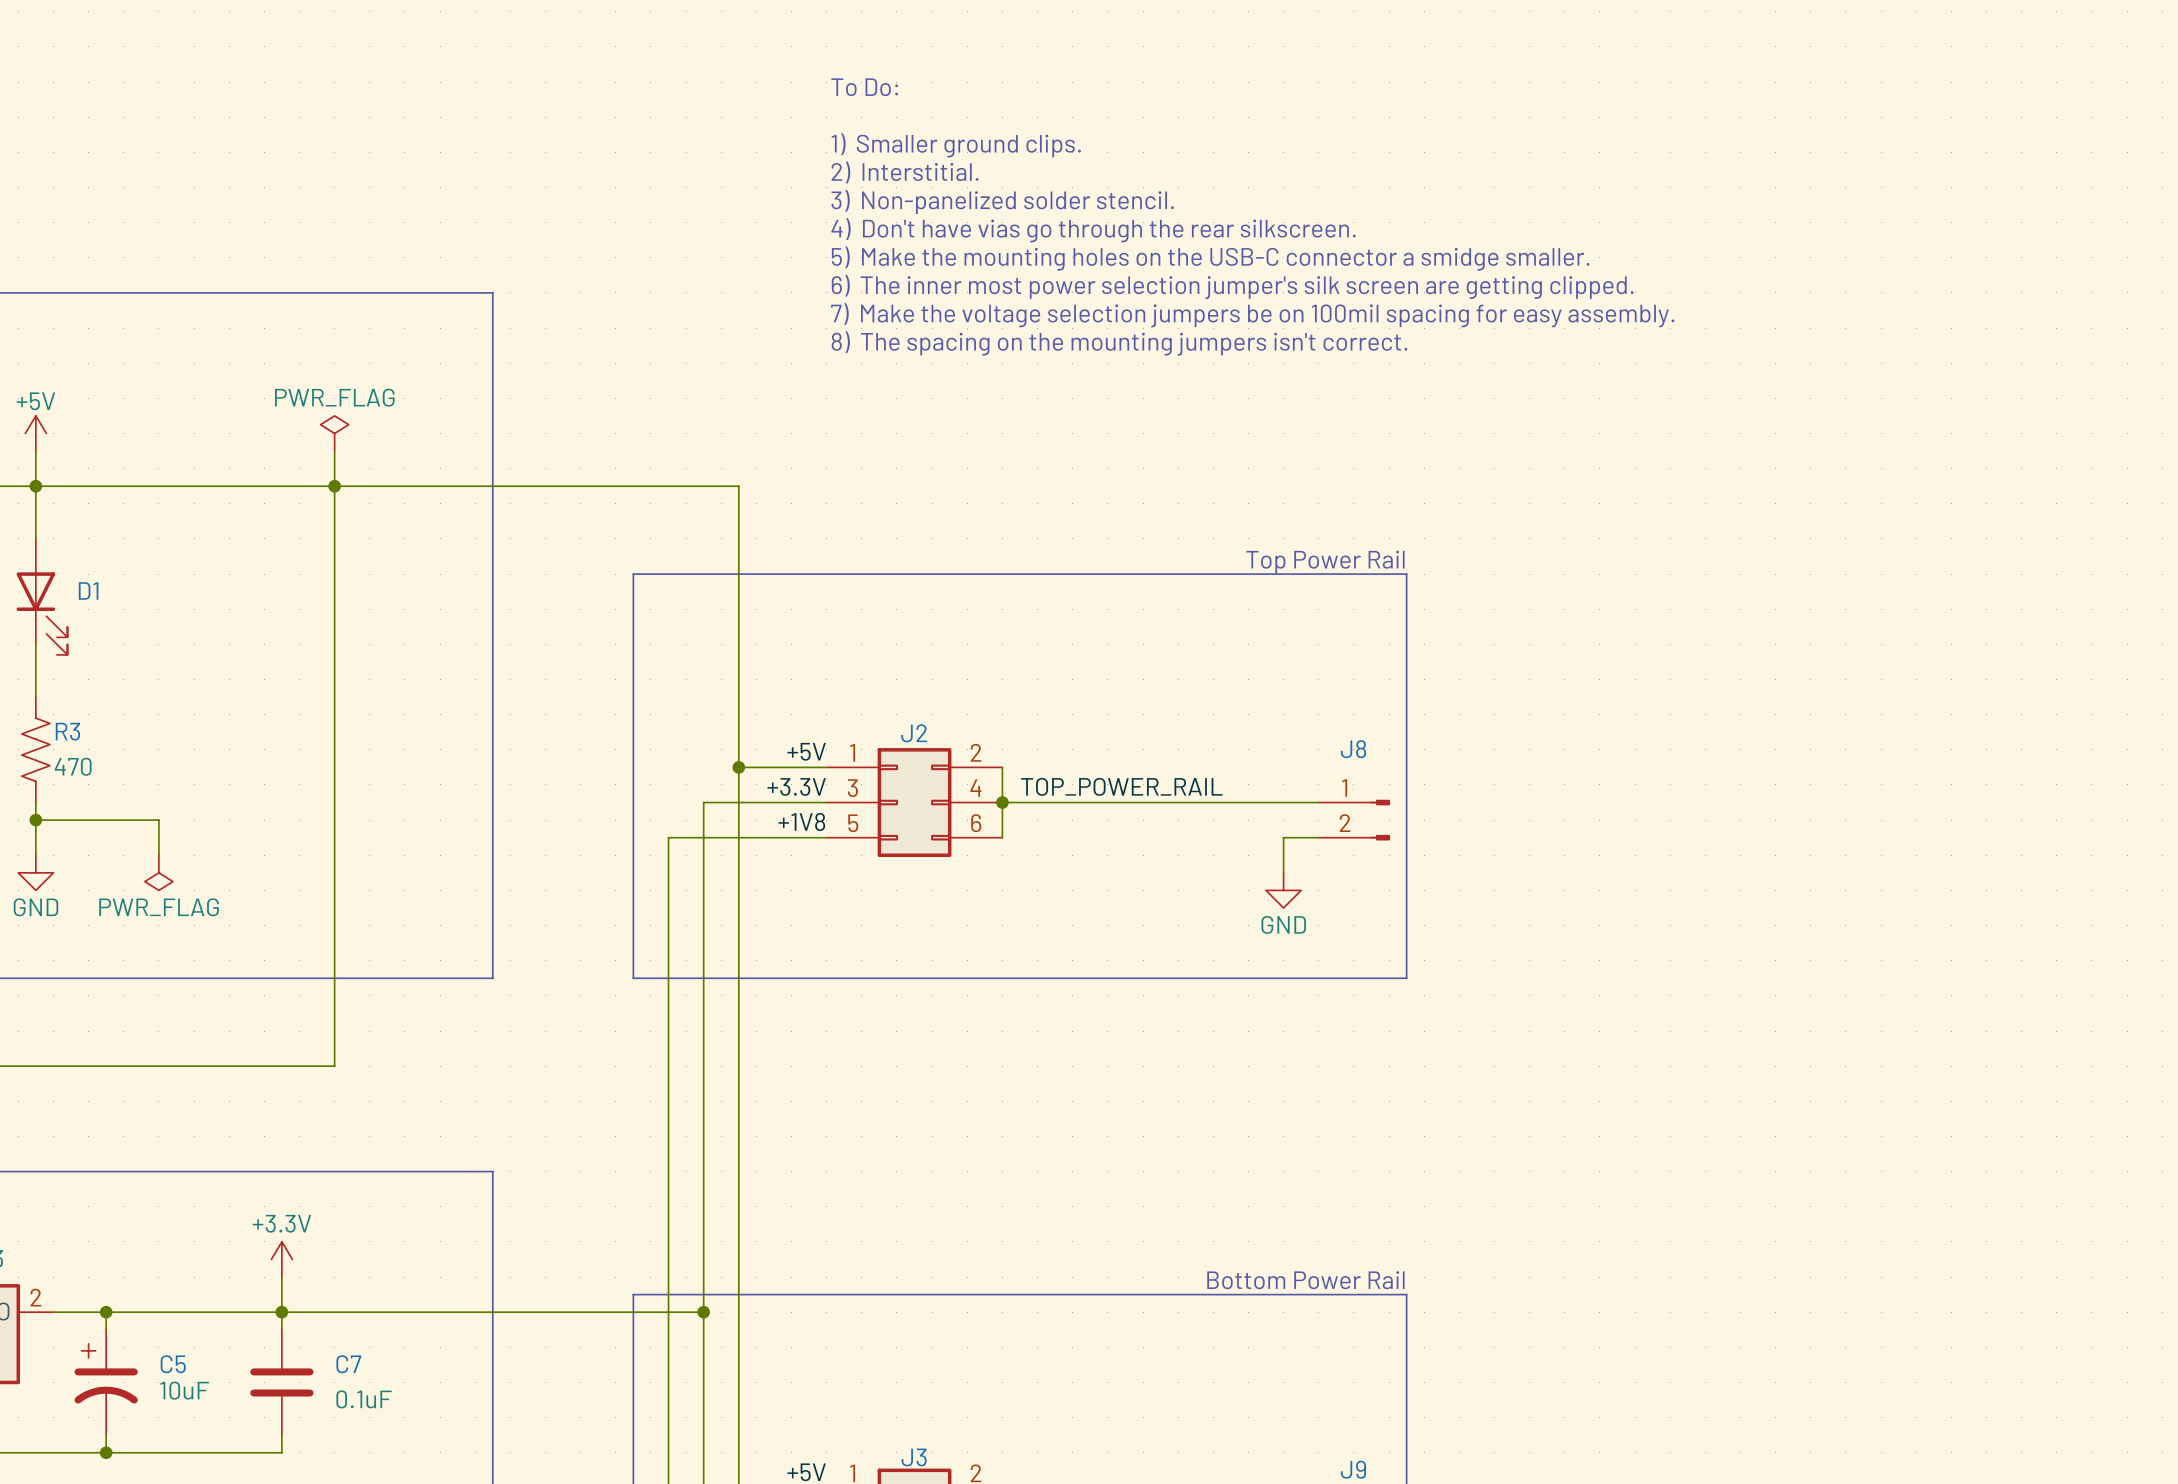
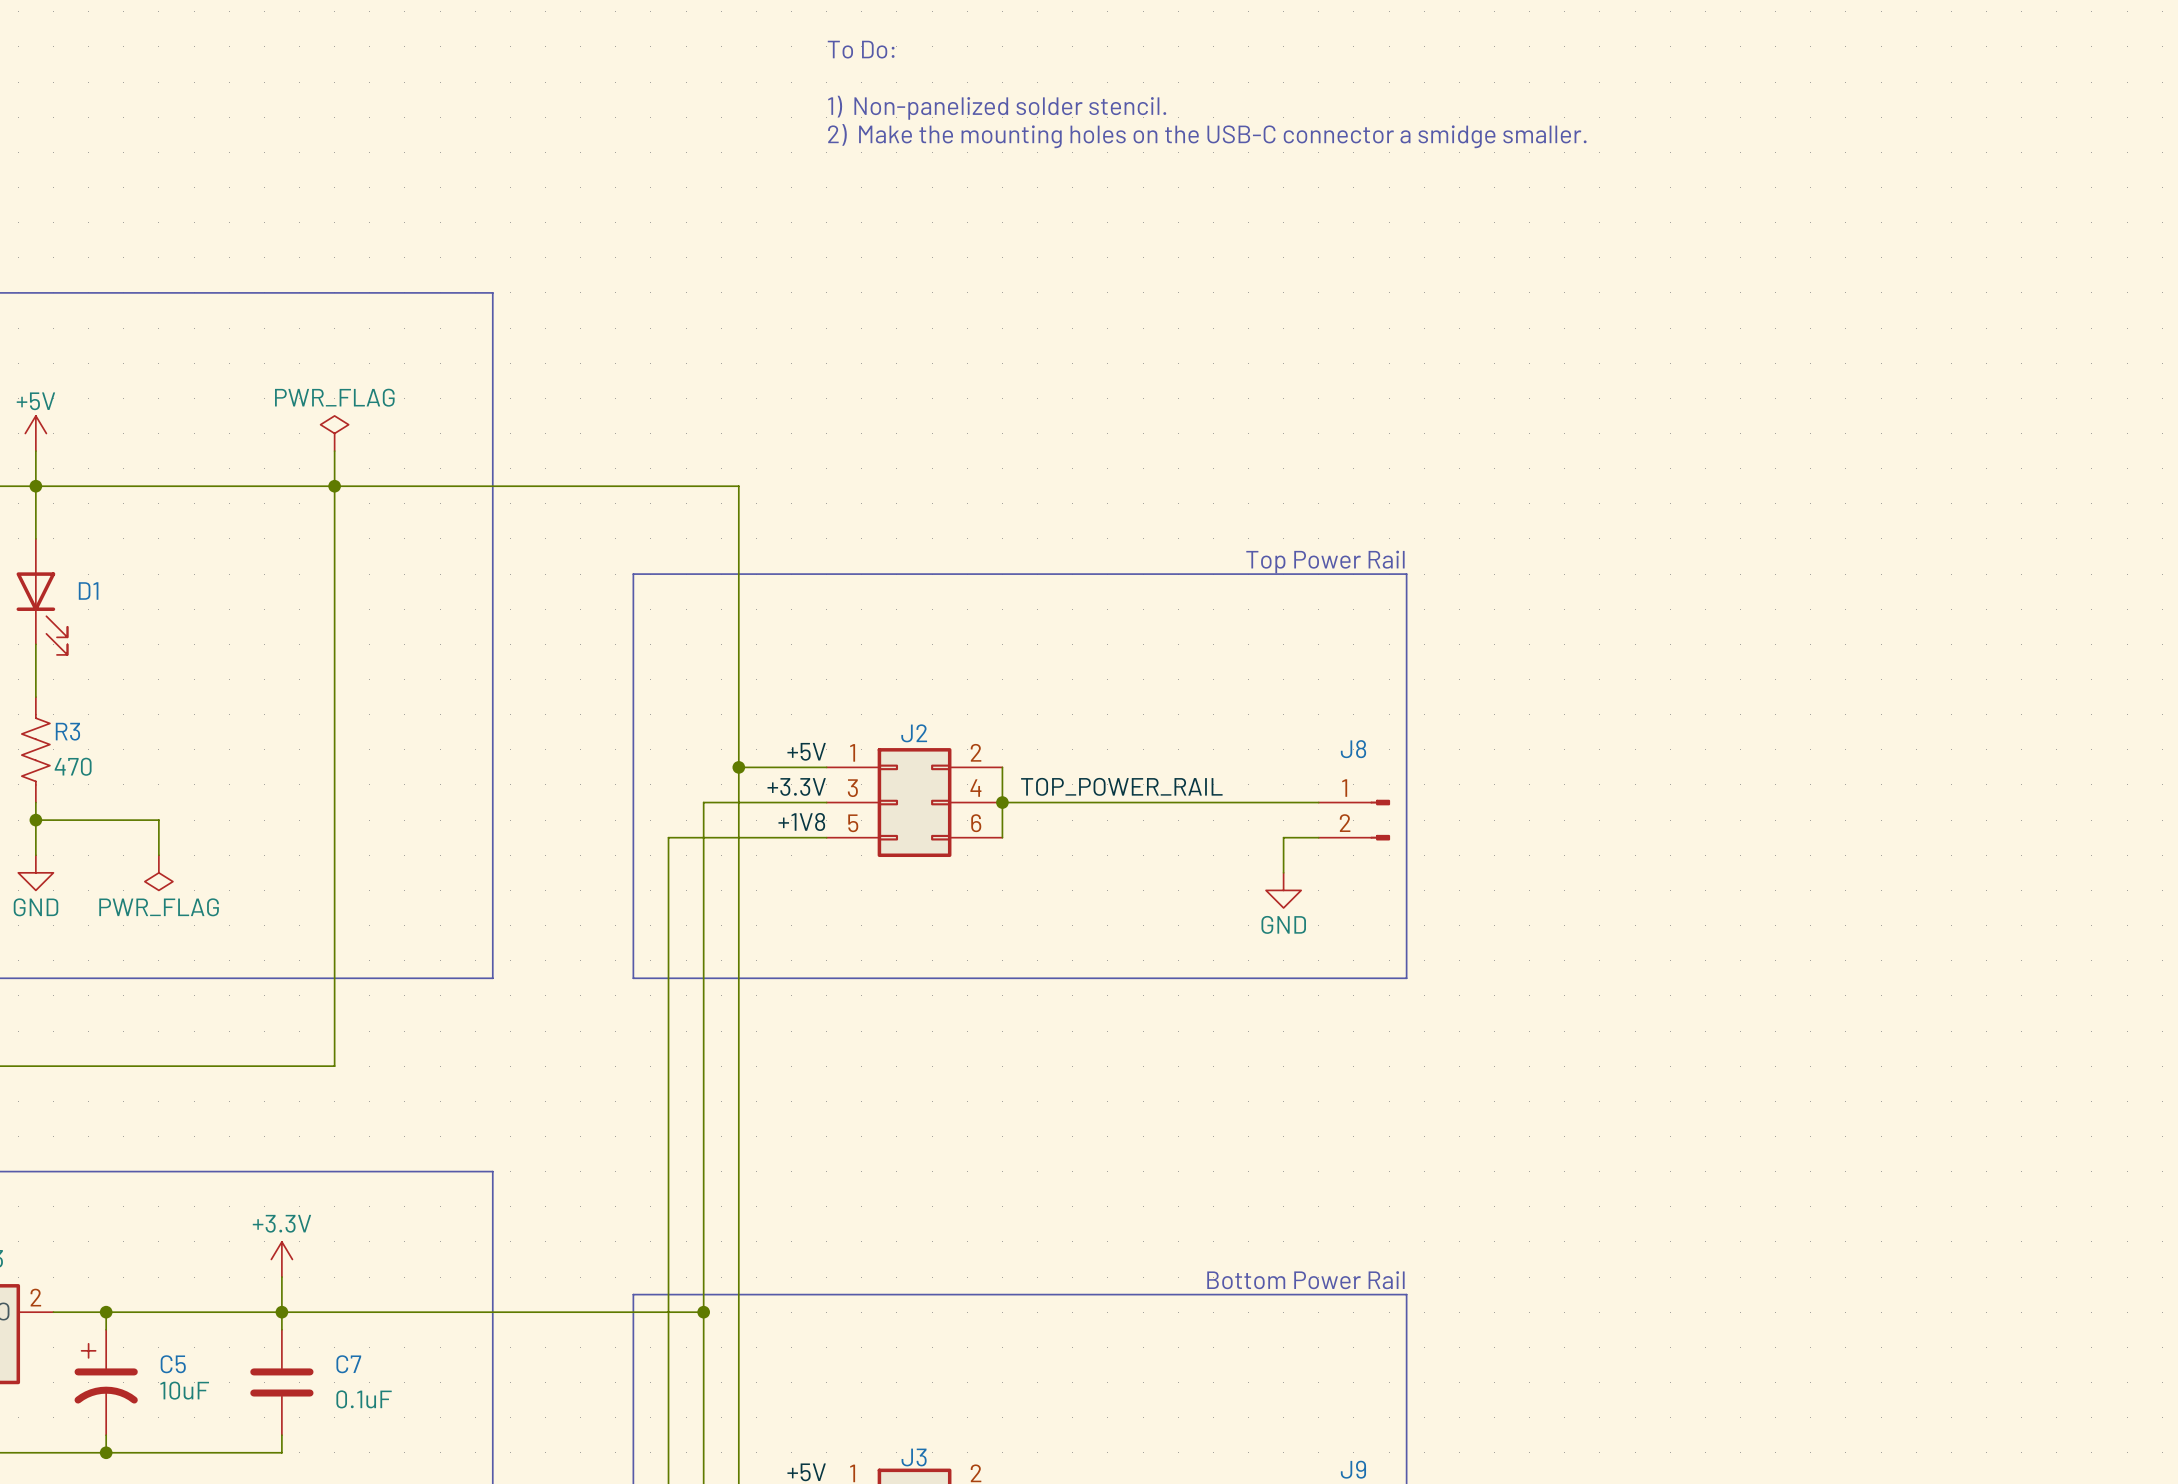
text position: To Do: (864, 87) -> To Do: (861, 49)
text: none -> 1) Non-panelized solder stencil. (997, 107)
text: 1) Smaller ground clips. (956, 145) -> 2) Make the mounting holes on the USB-C connector a smidge smaller. (1207, 136)
text: 2) Interstitial. (905, 172) -> none
text: 3) Non-panelized solder stencil. (1002, 201) -> none
text: 4) Don't have vias go through the rear silkscreen. (1093, 230) -> none
text: 5) Make the mounting holes on the USB-C connector a smidge smaller. (1210, 258) -> none
text: 6) The inner most power selection jumper's silk screen are getting clipped. (1232, 287) -> none
text: 7) Make the voltage selection jumpers be on 100mil spacing for easy assembly. (1252, 315) -> none
text: 8) The spacing on the mounting jumpers isn't correct. (1119, 343) -> none

